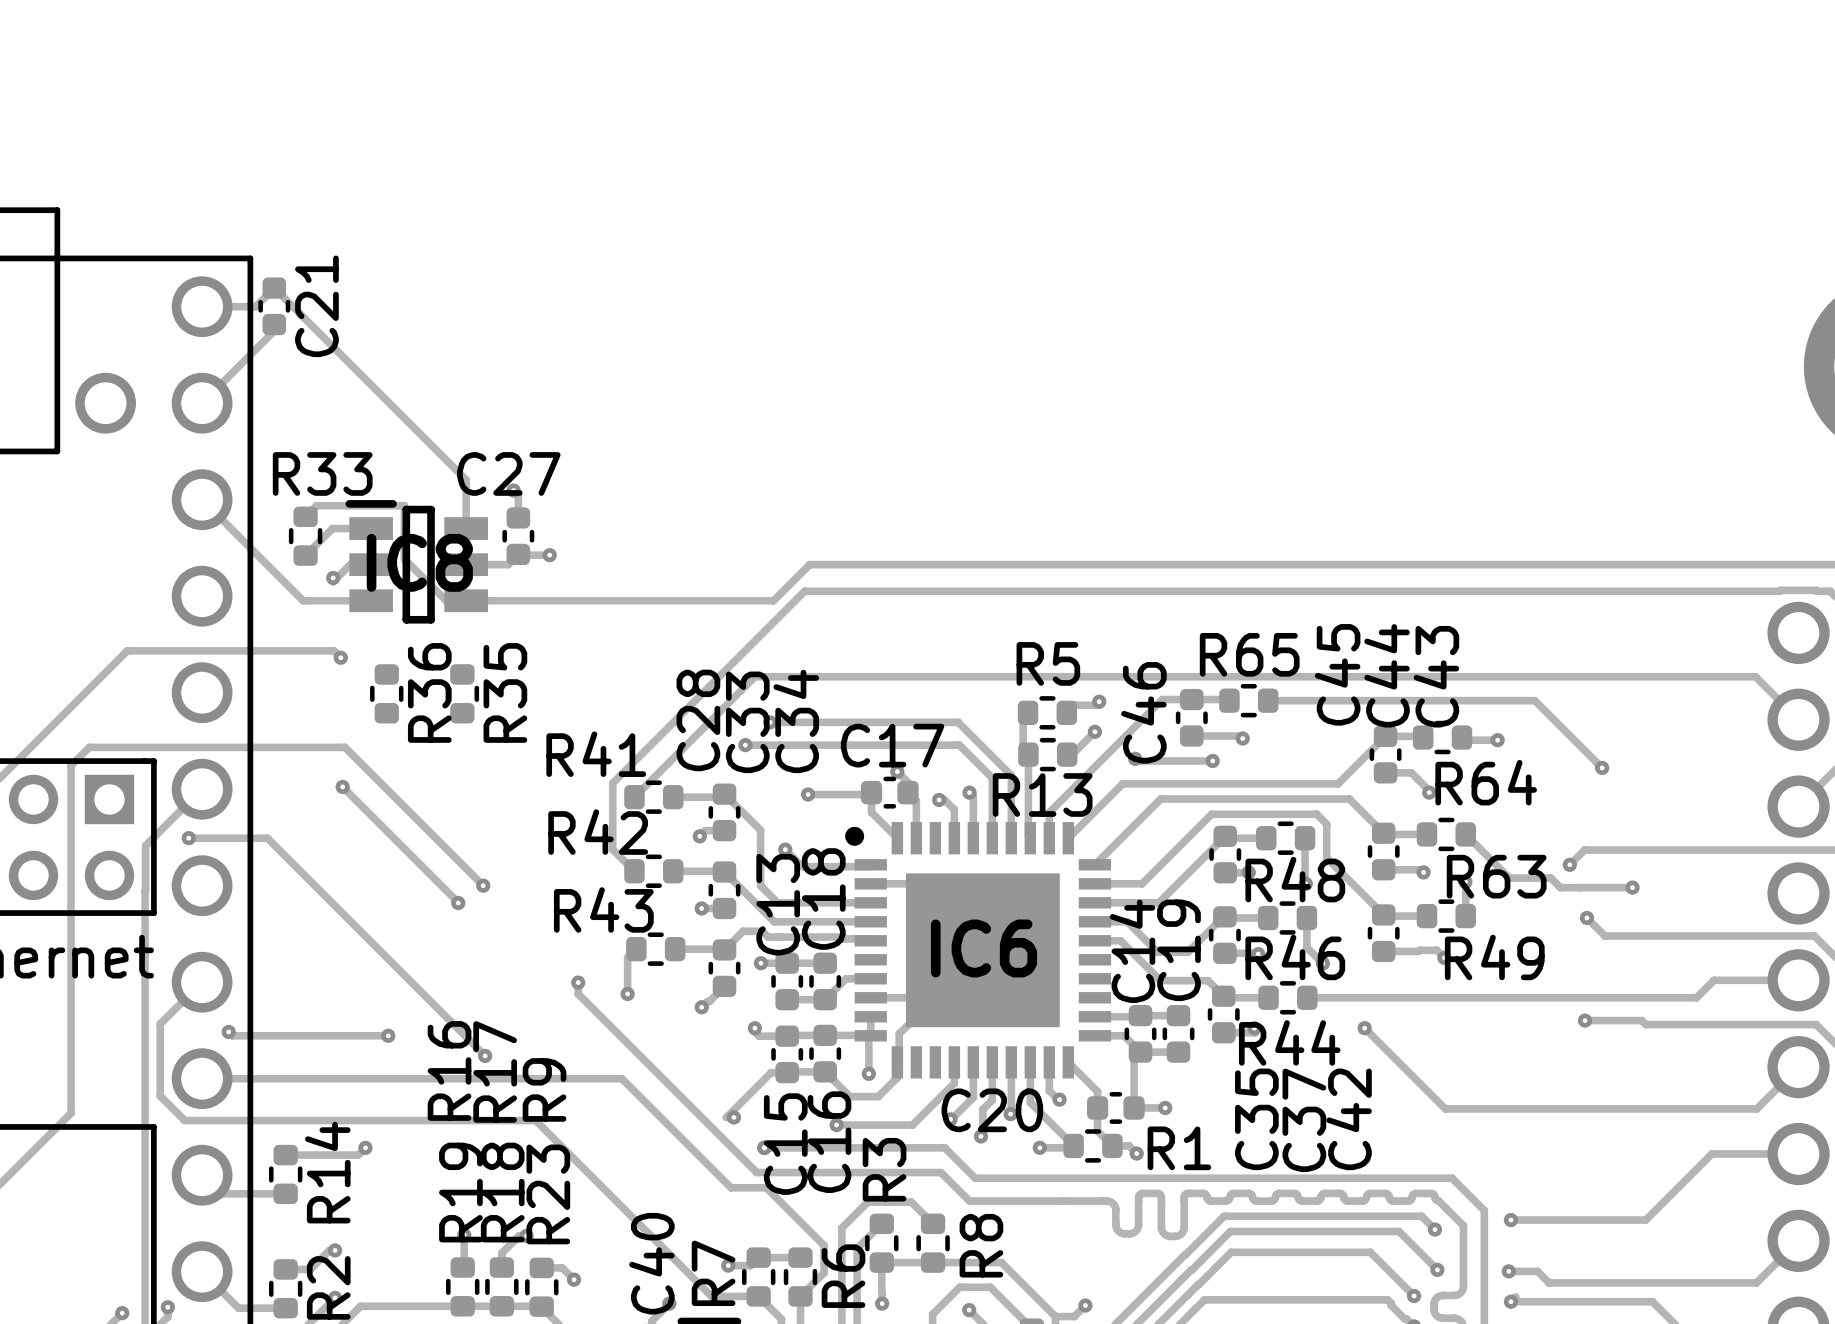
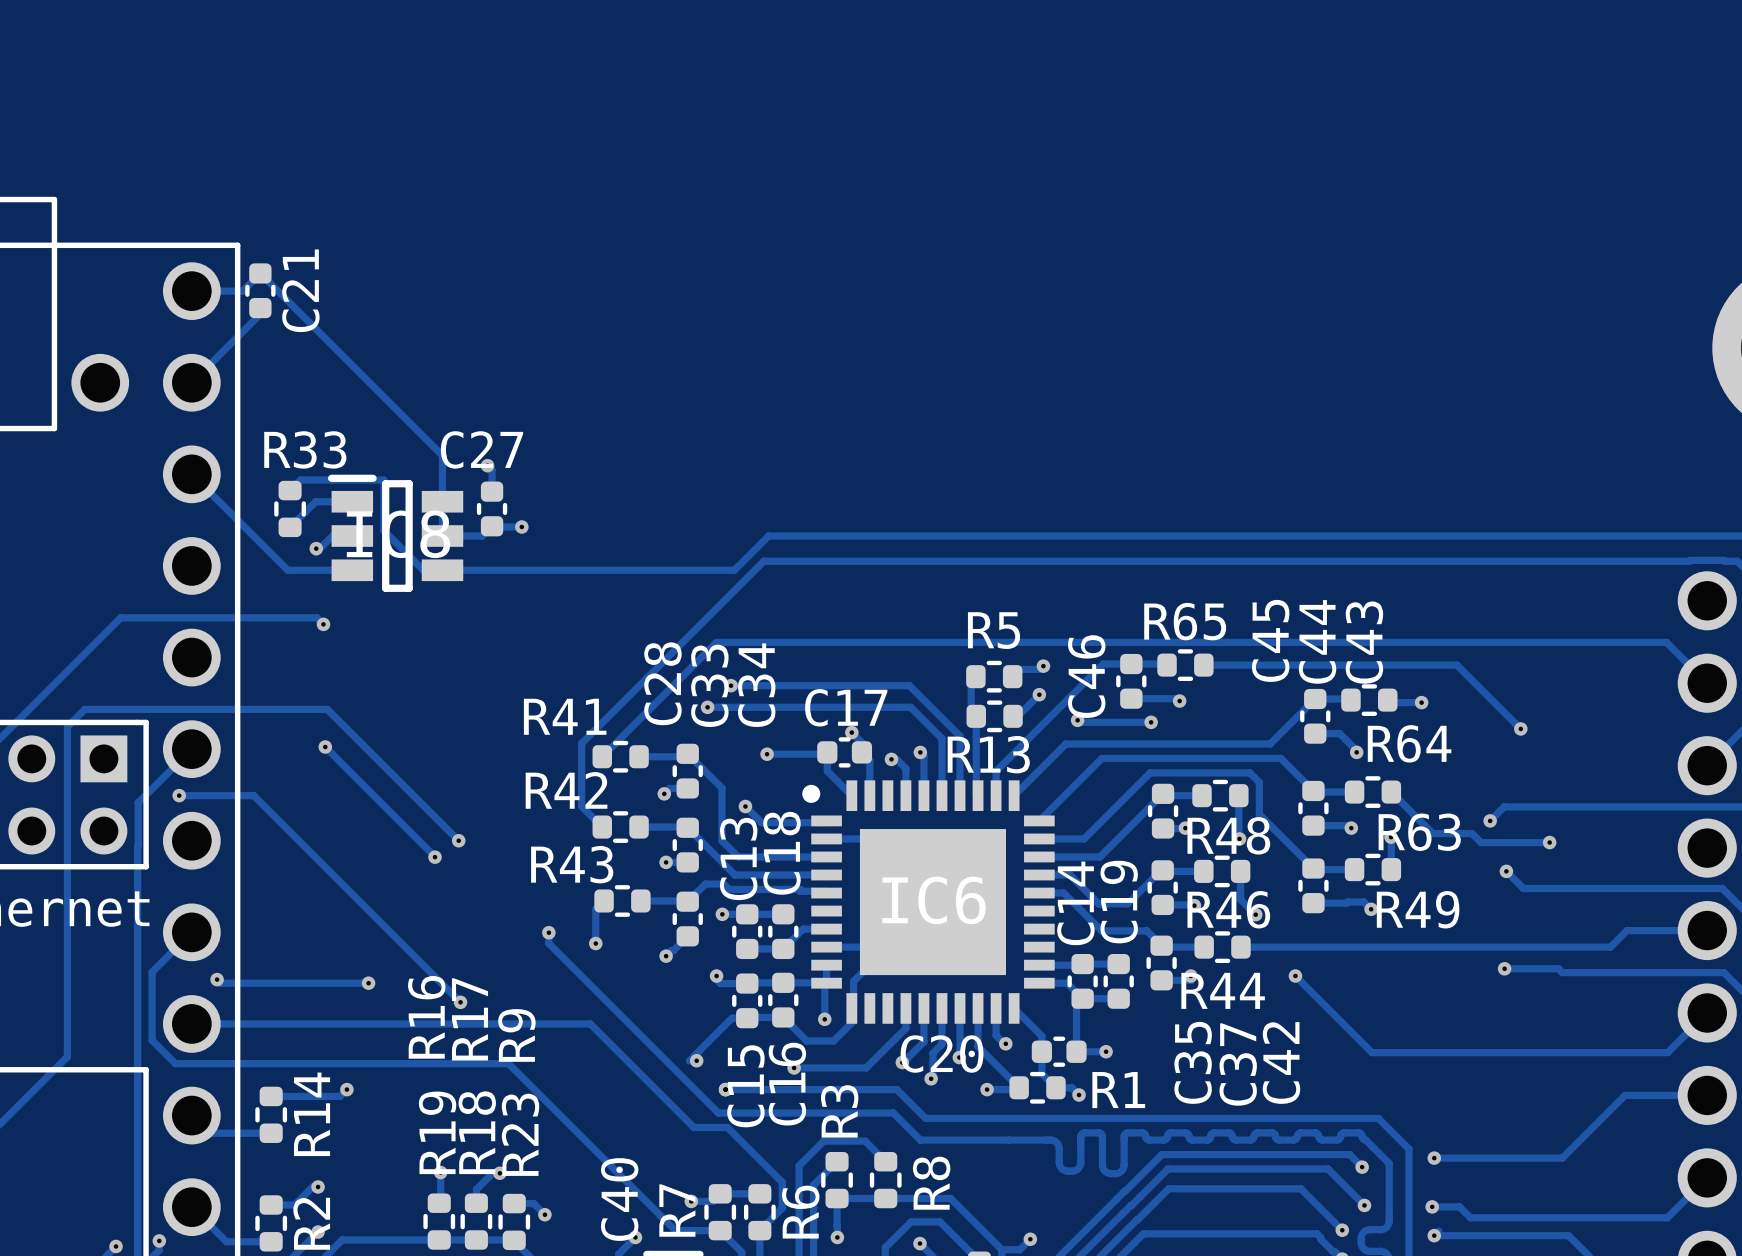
R36: (386, 693) -> none
R35: (462, 693) -> none

